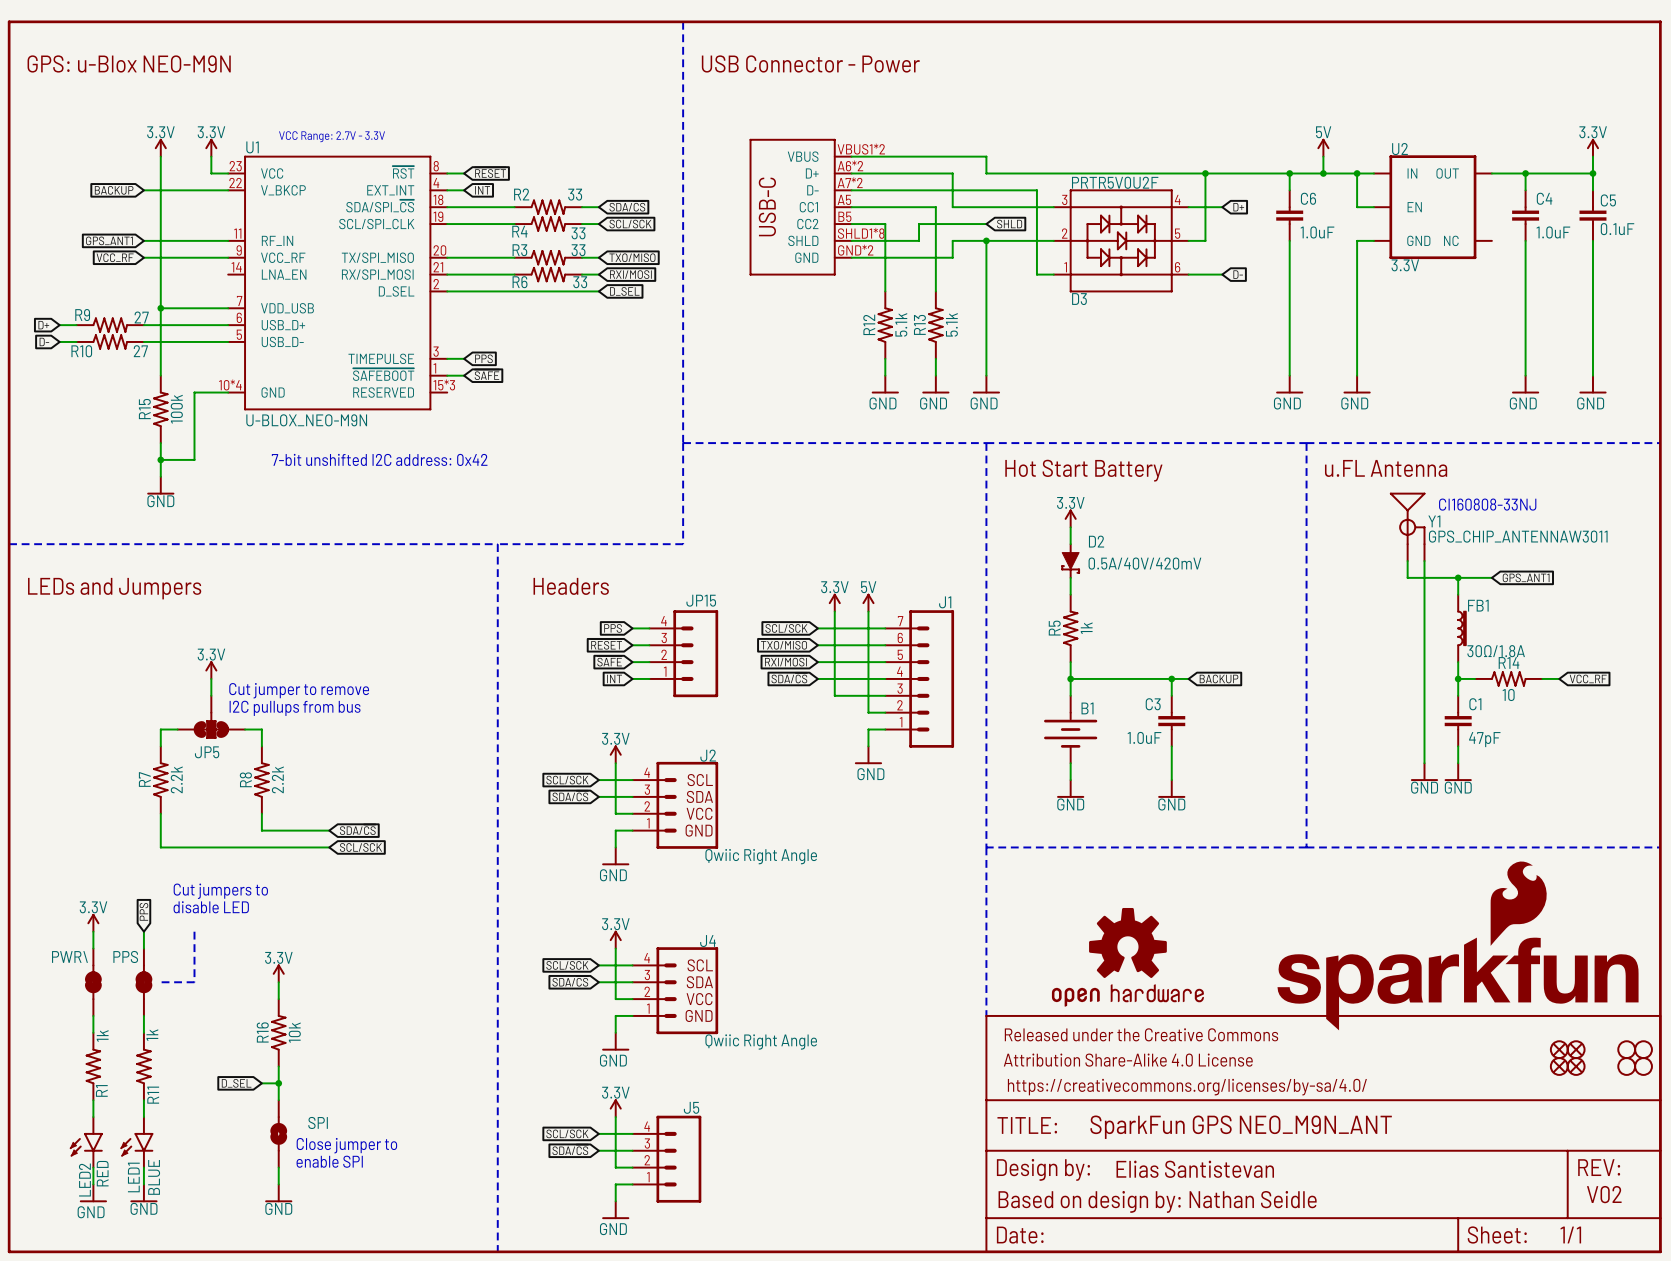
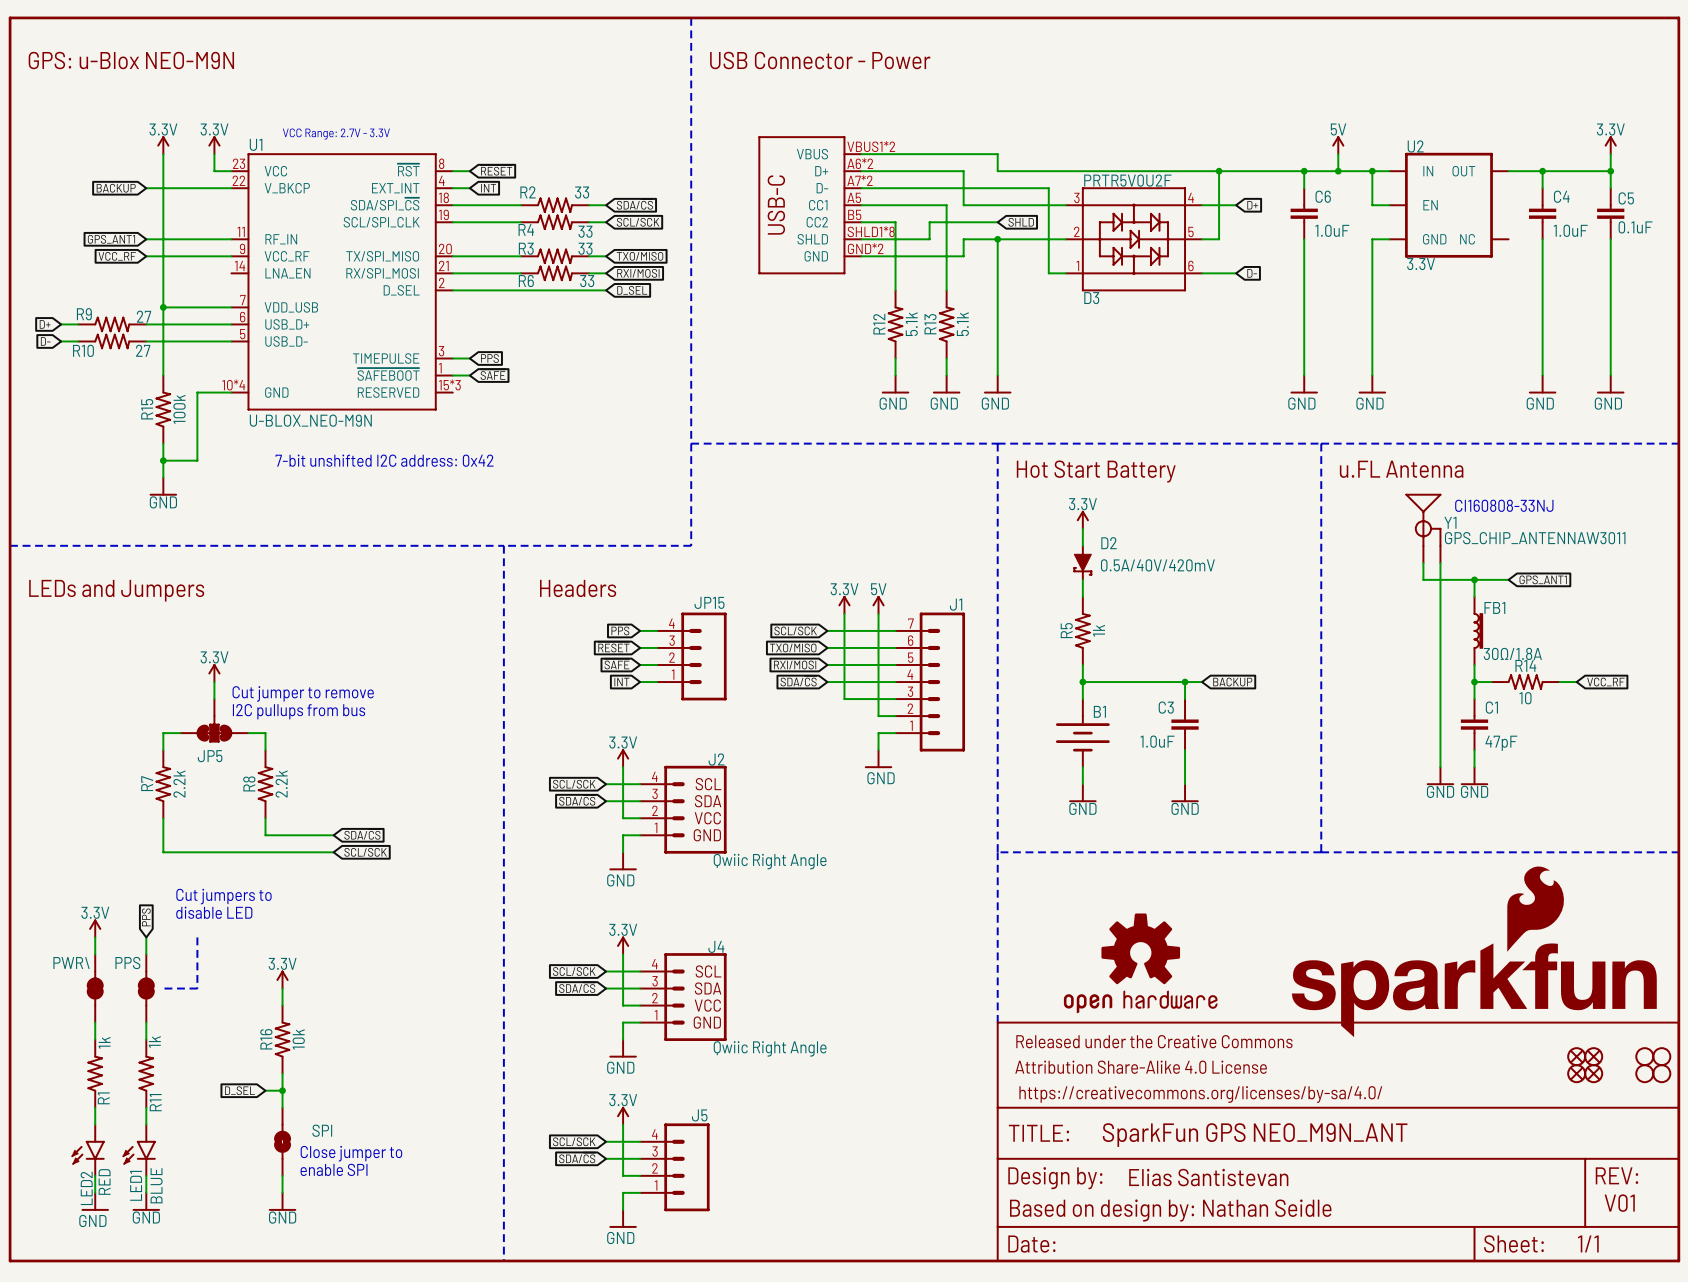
text: V02 (1604, 1194) -> V01 (1619, 1203)

